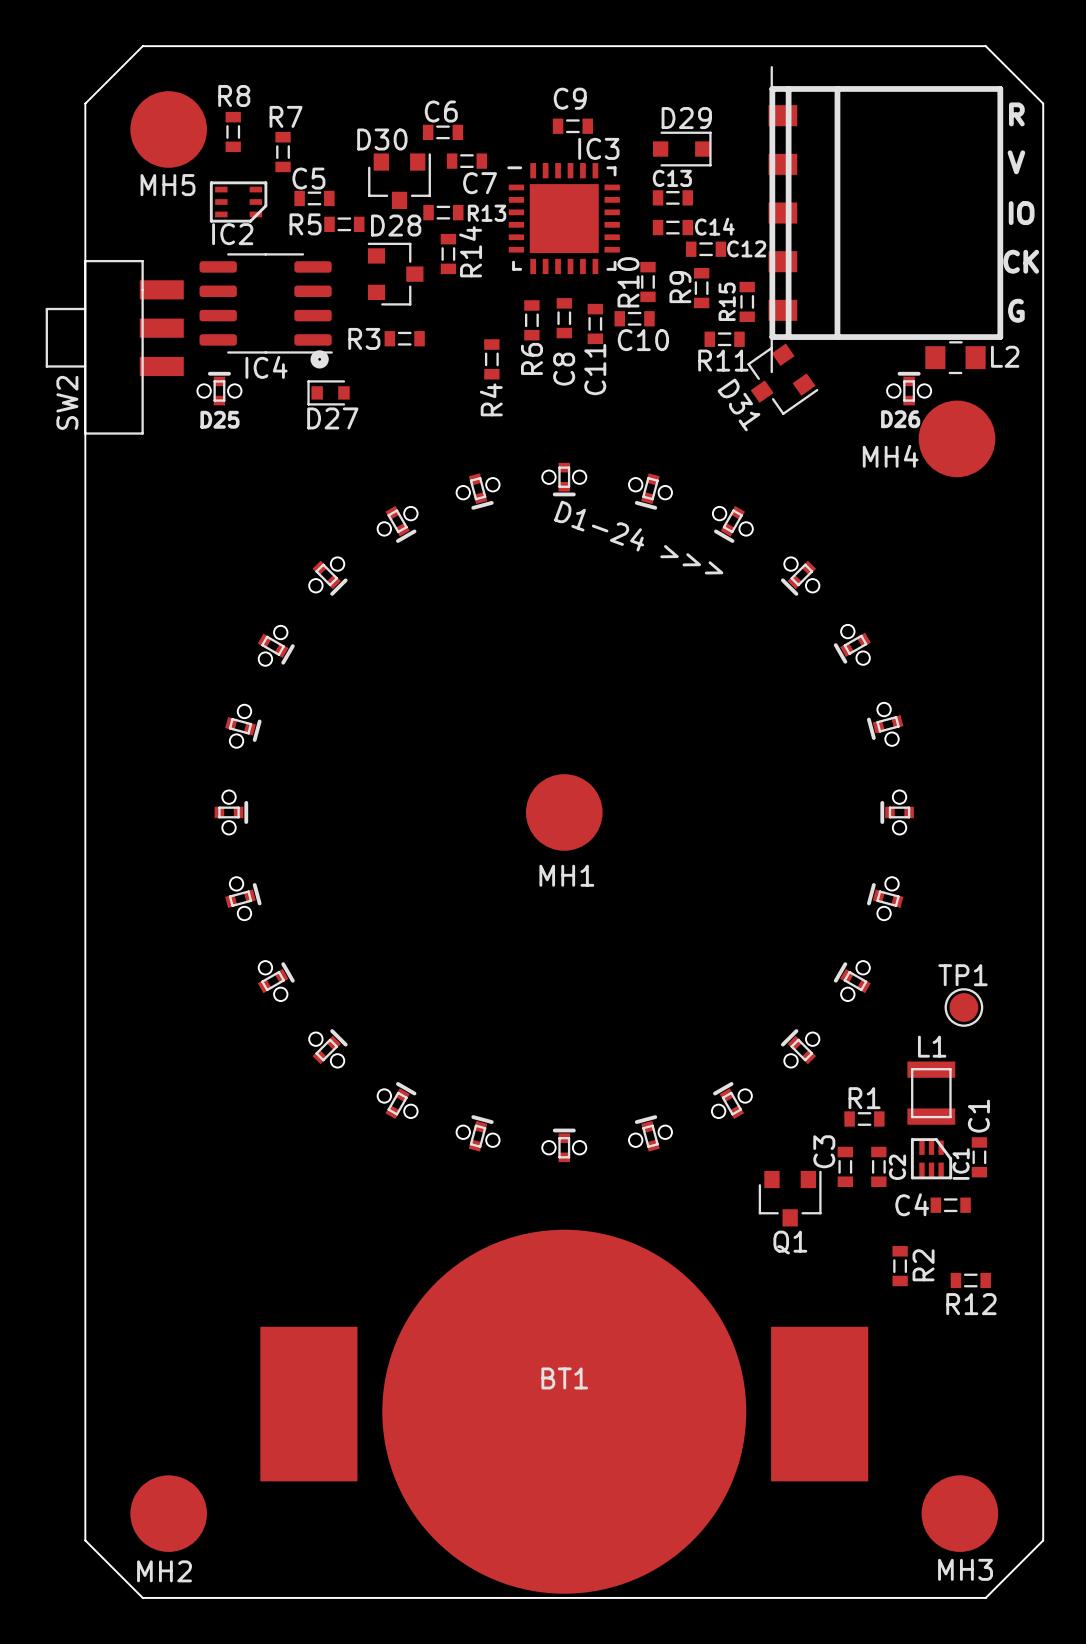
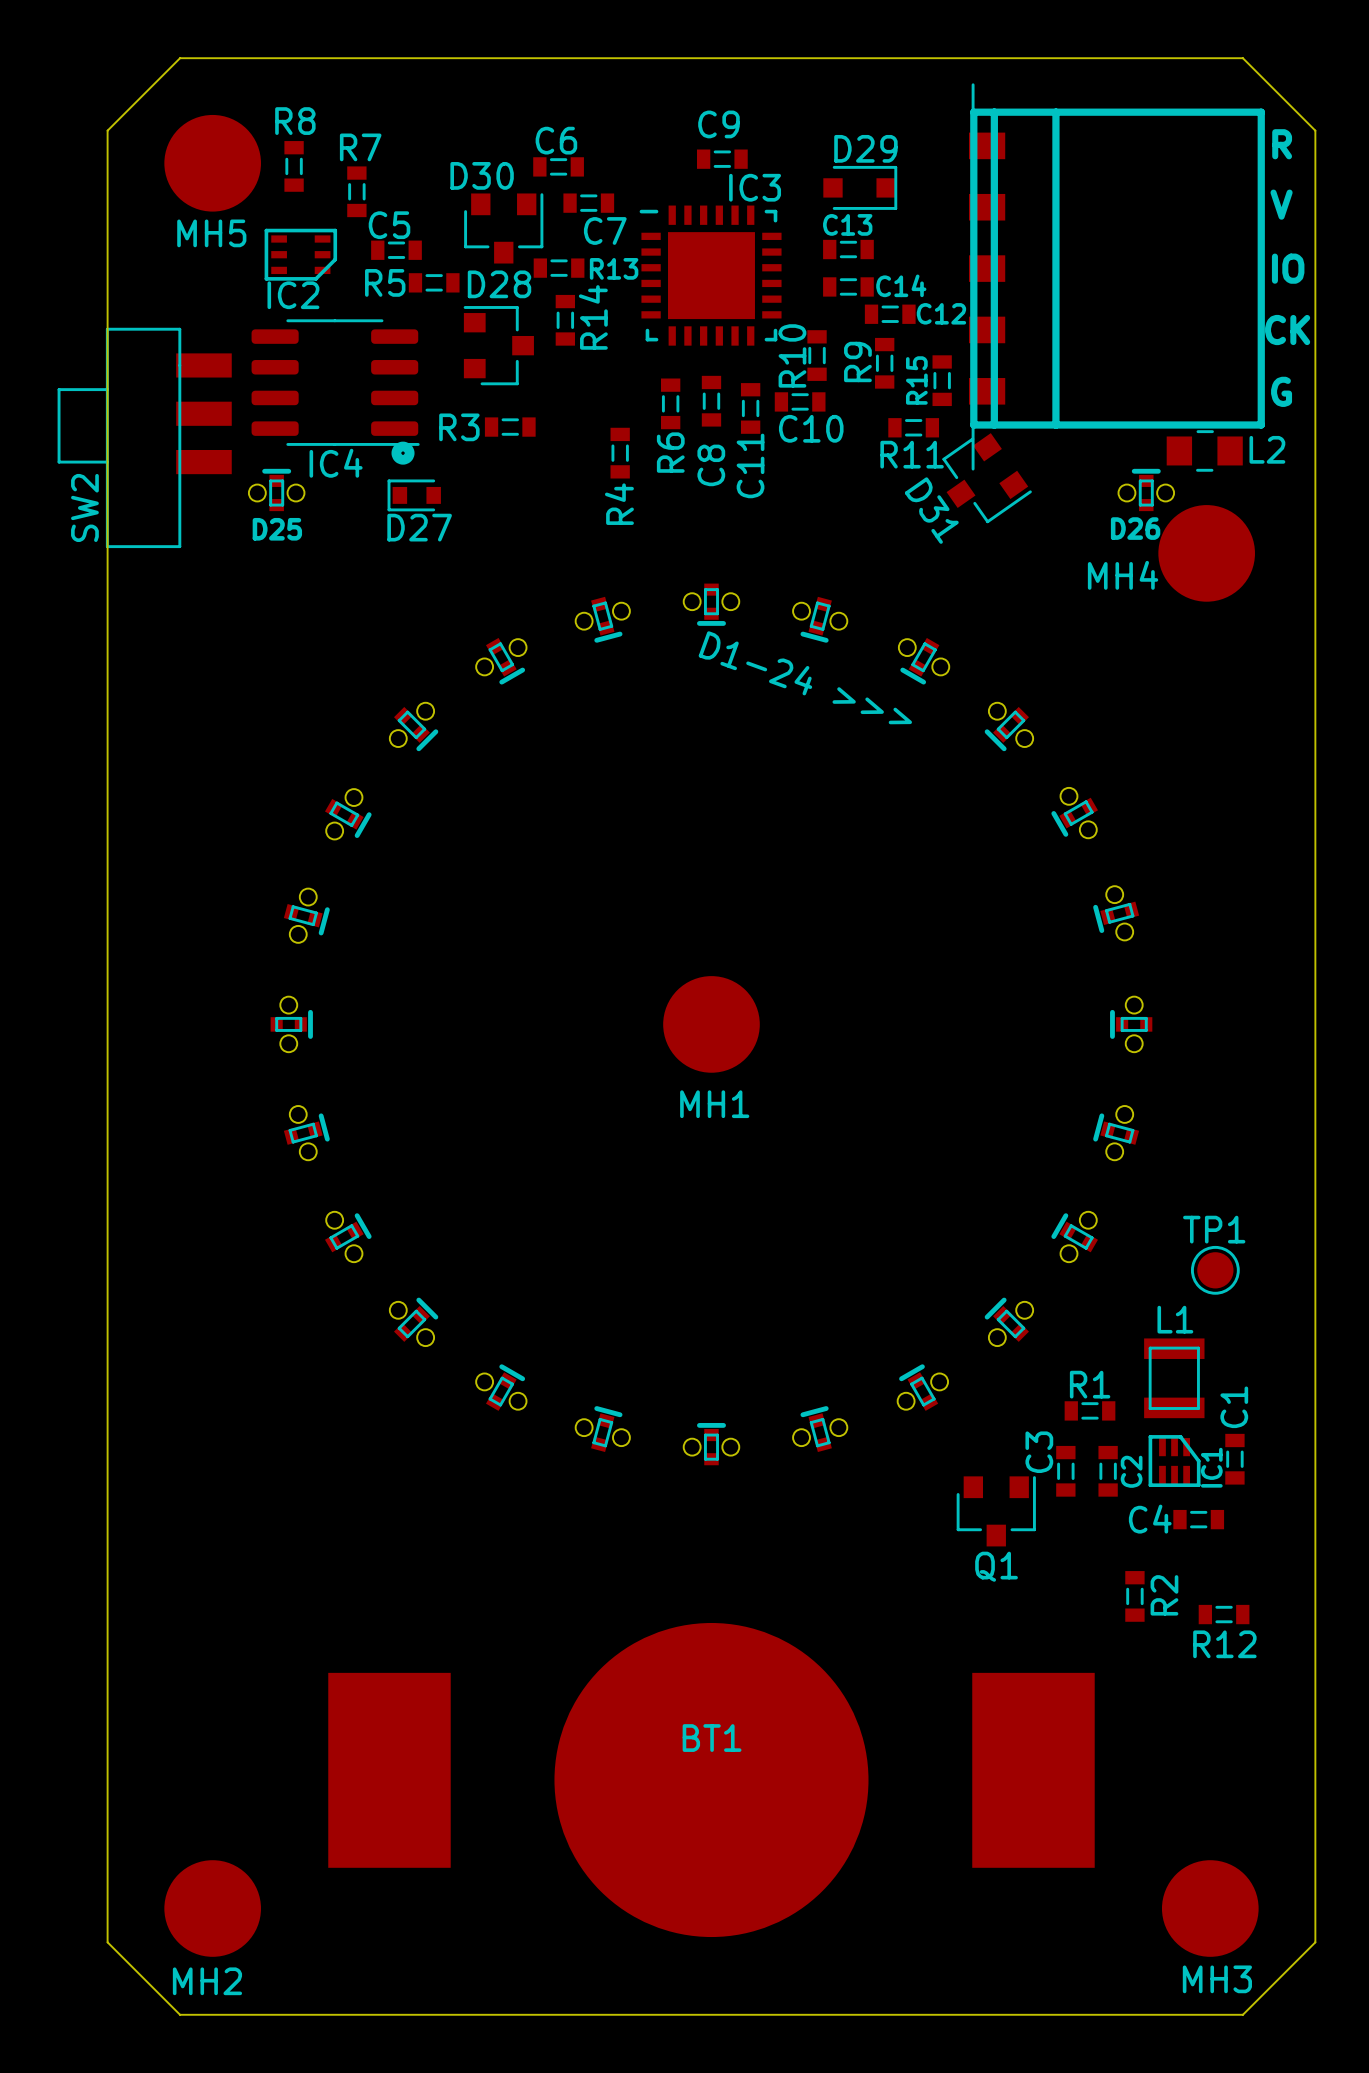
BT1 footprint: [260, 1229, 869, 1594] -> [328, 1622, 1095, 1938]

